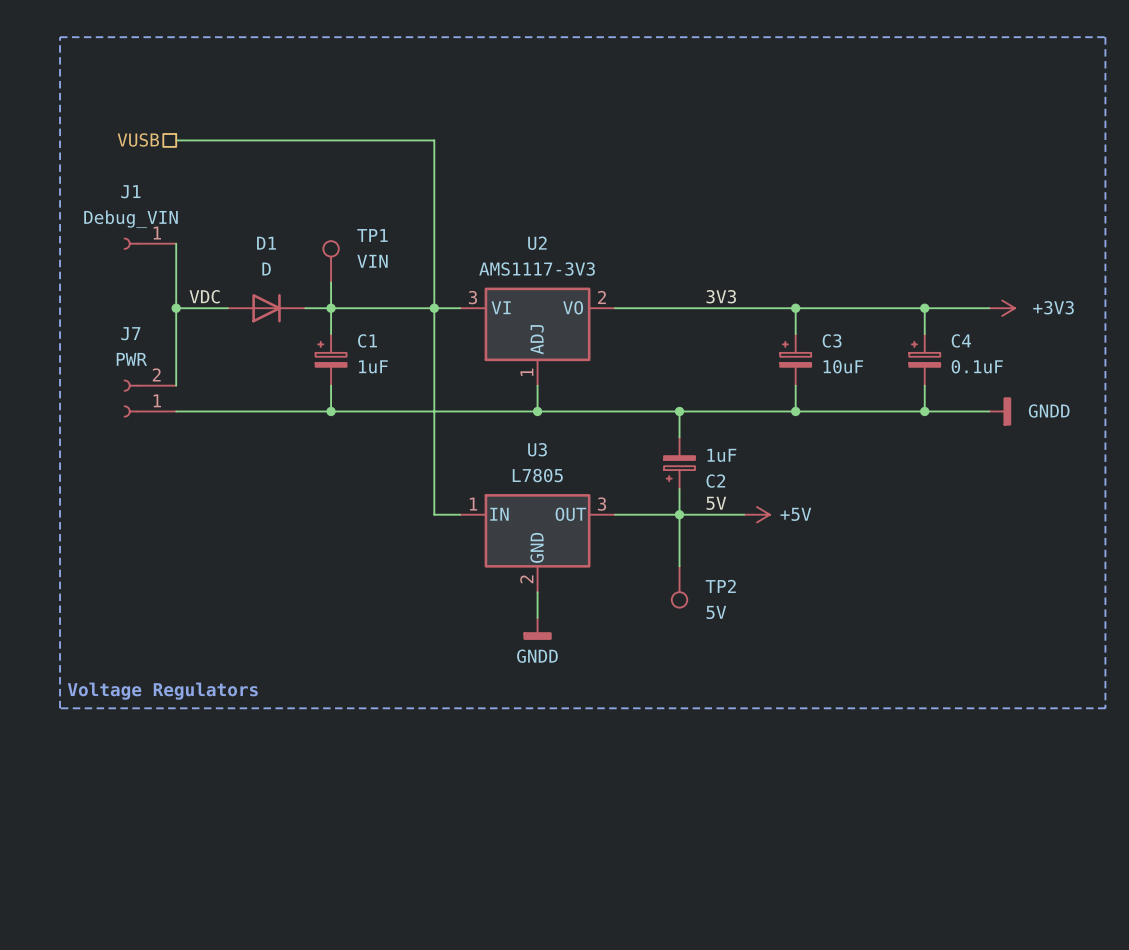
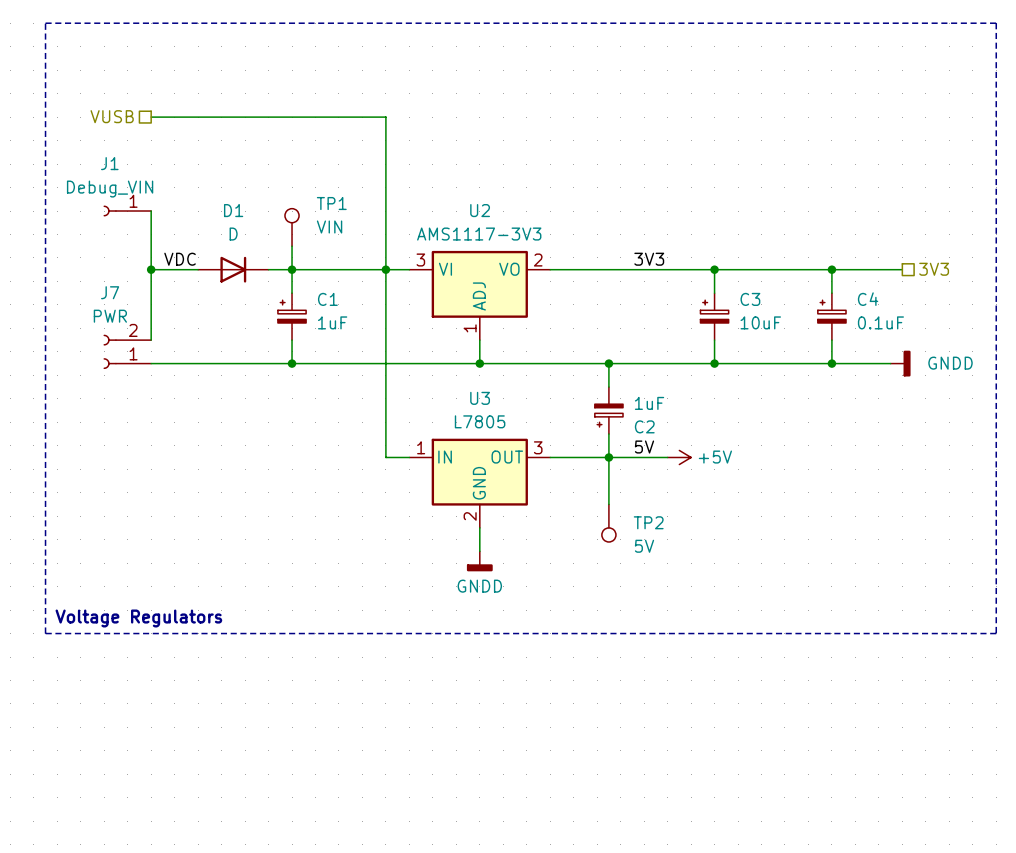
hierarchical label: none -> 3V3 (934, 269)
power symbol: +3V3 (1002, 308) -> none

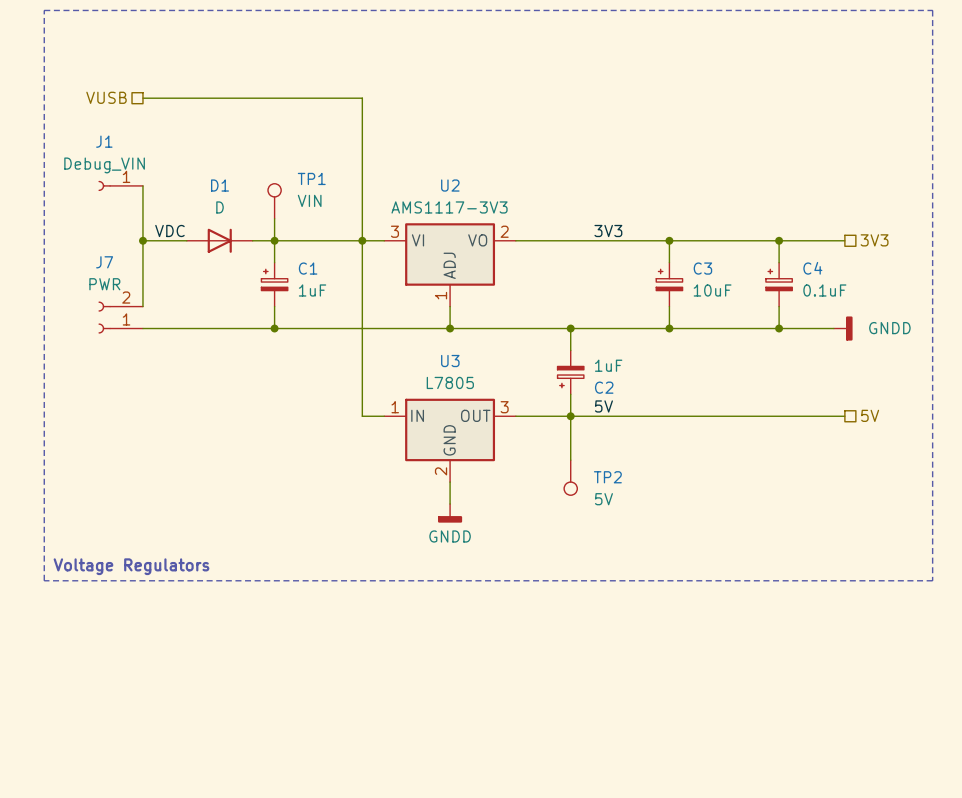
wire: none -> (625, 416) (844, 416)
power symbol: +5V (679, 457) -> none
hierarchical label: none -> 5V (870, 415)

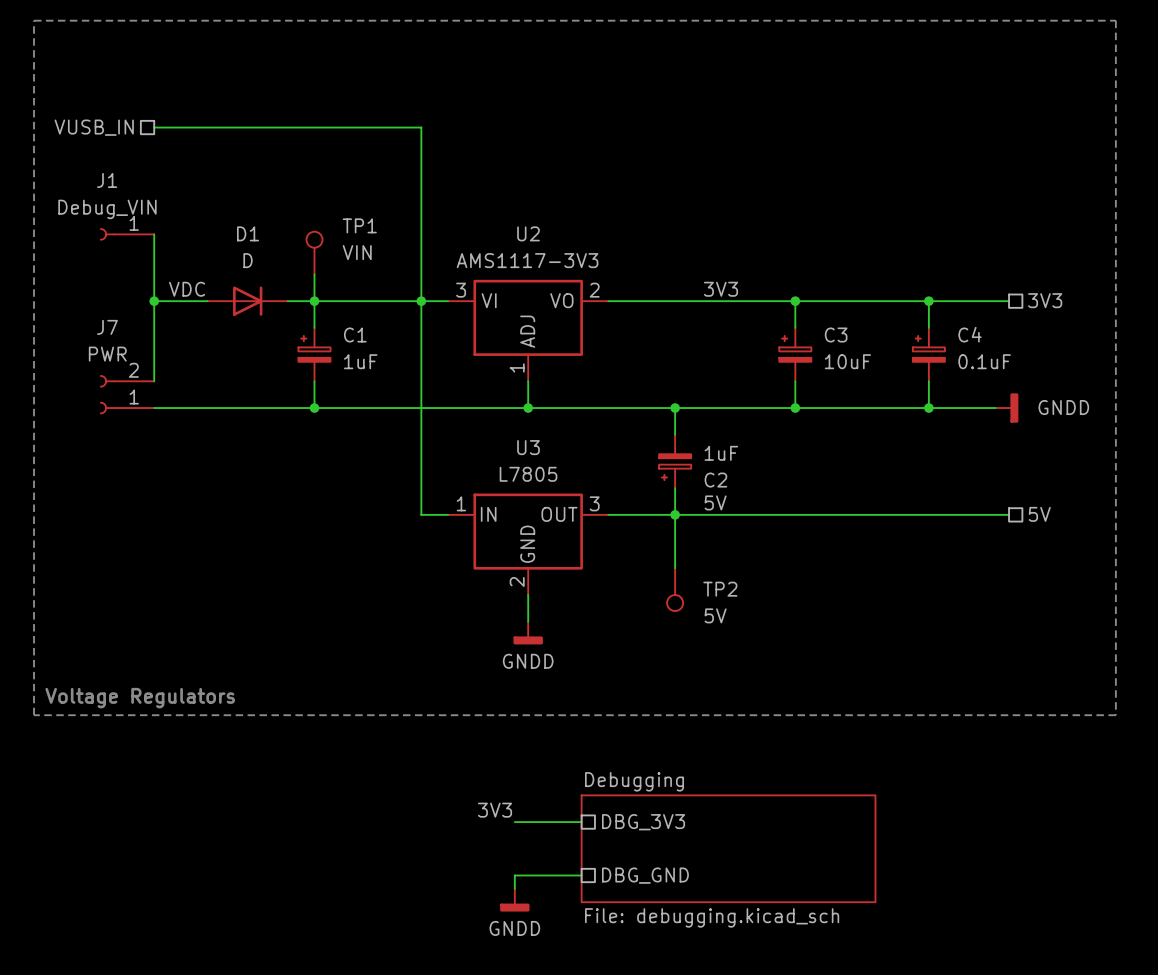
hierarchical label: VUSB (106, 97) -> VUSB_IN (94, 127)
label: none -> 3V3 (495, 810)
wire: none -> (514, 822) (581, 822)
sheet pin: none -> DBG_3V3 (643, 822)
sheet Debugging: none -> File: debugging.kicad_sch (728, 848)
wire: none -> (581, 875) (514, 875) (514, 888)
sheet pin: none -> DBG_GND (645, 875)
power symbol: none -> GNDD (514, 900)

